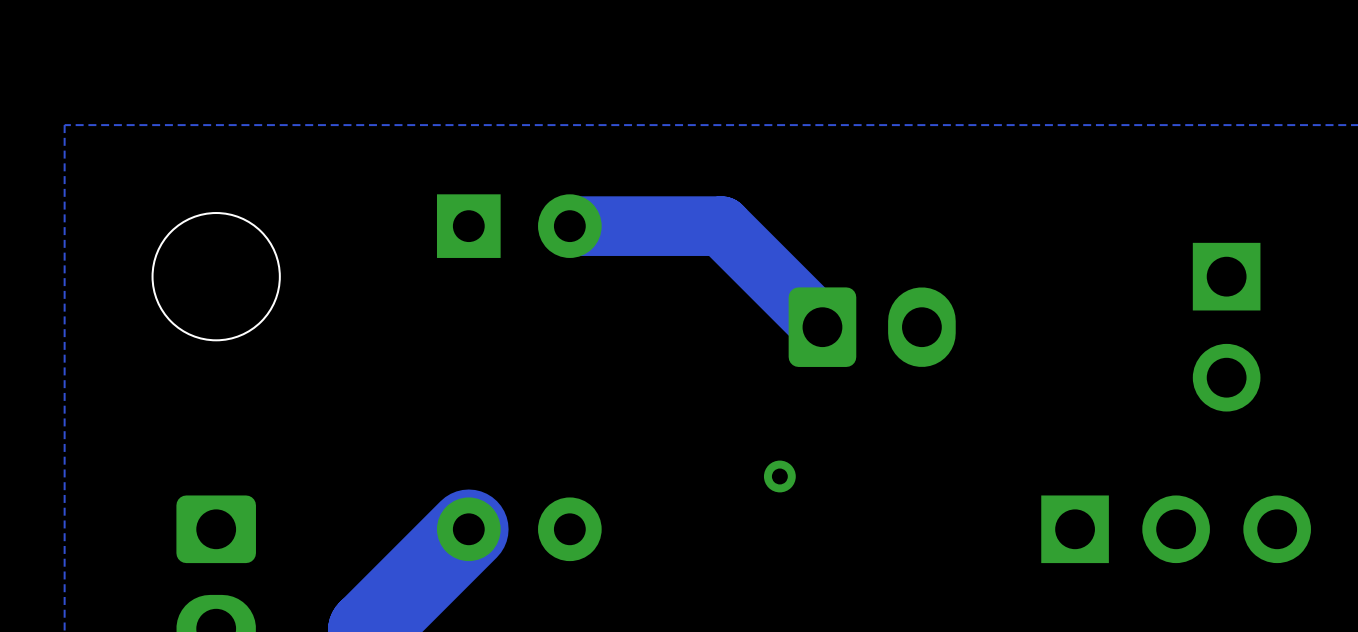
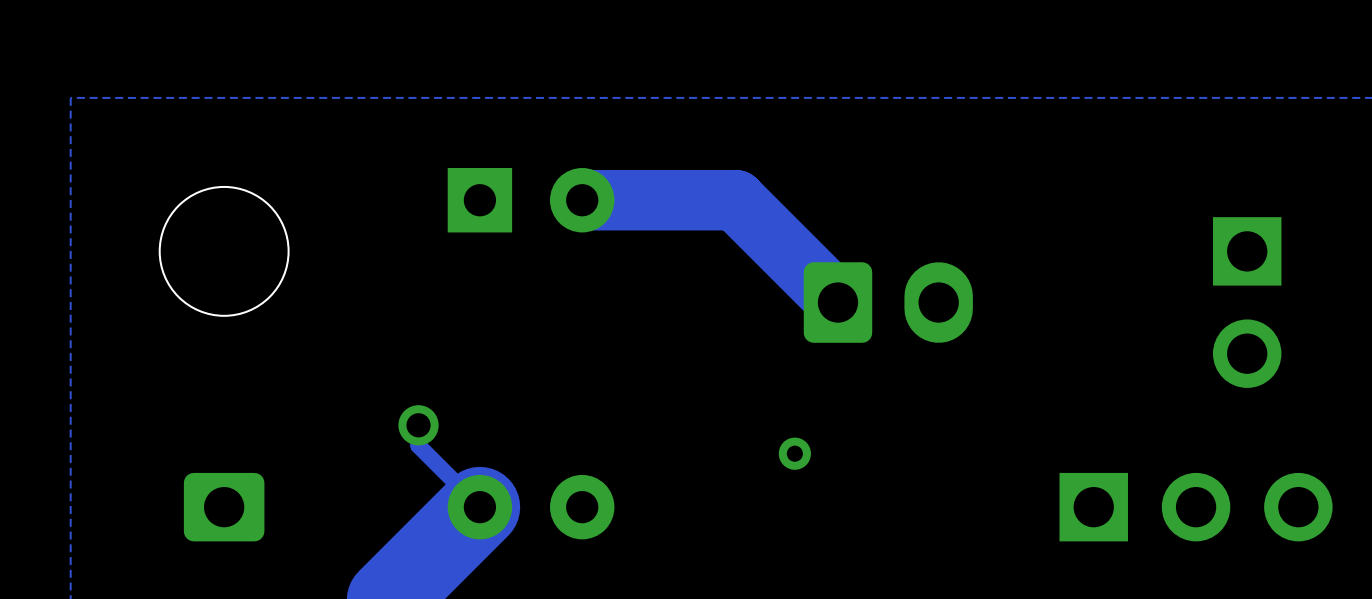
track: none -> (418, 425) (418, 445) (479, 507)
via: none -> (418, 425)

